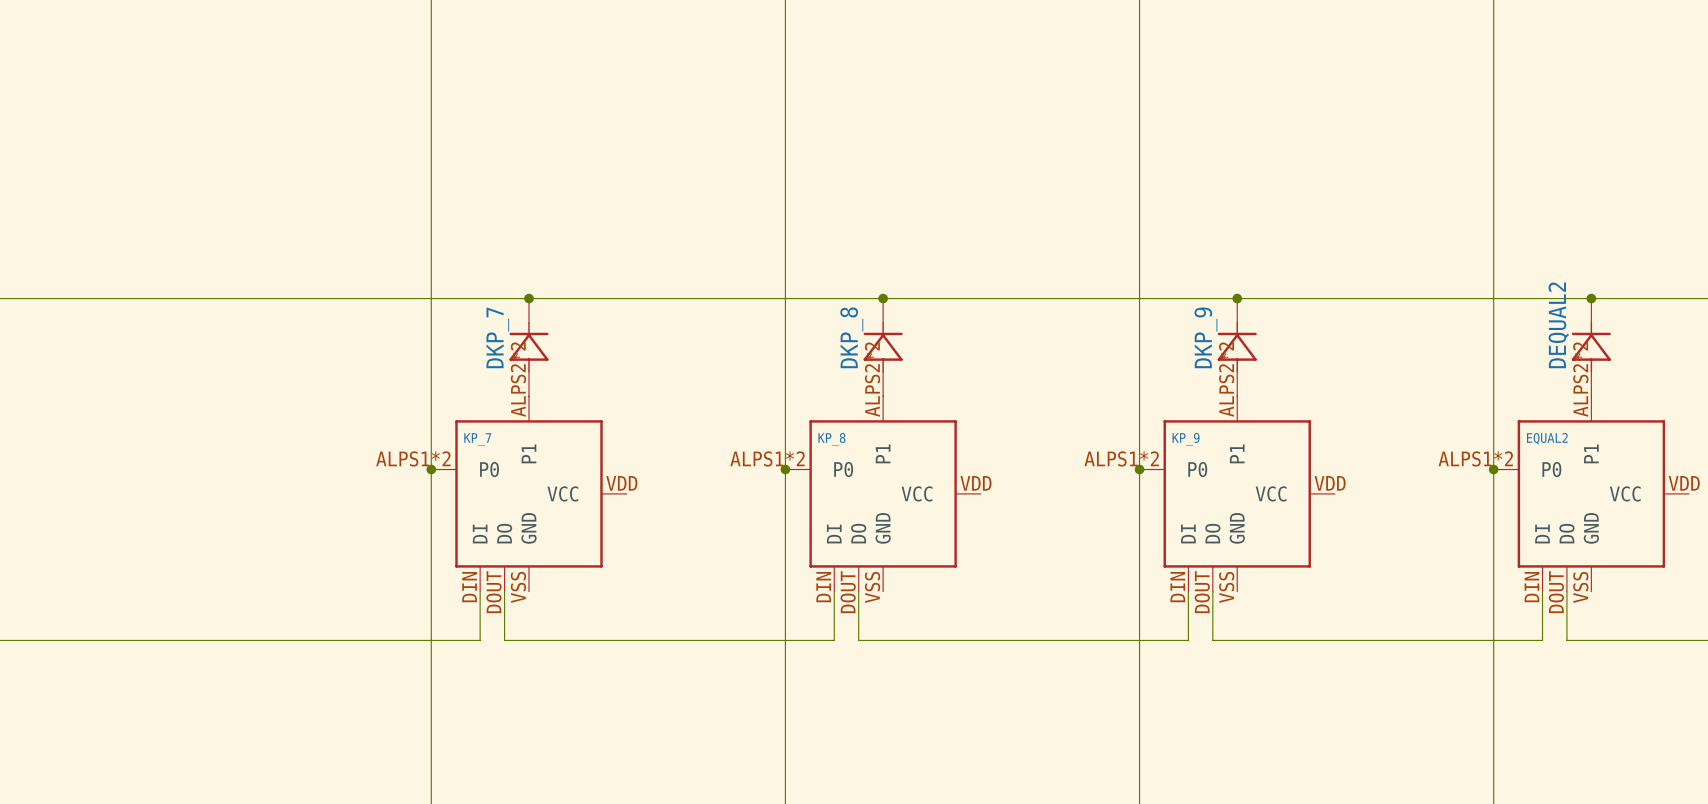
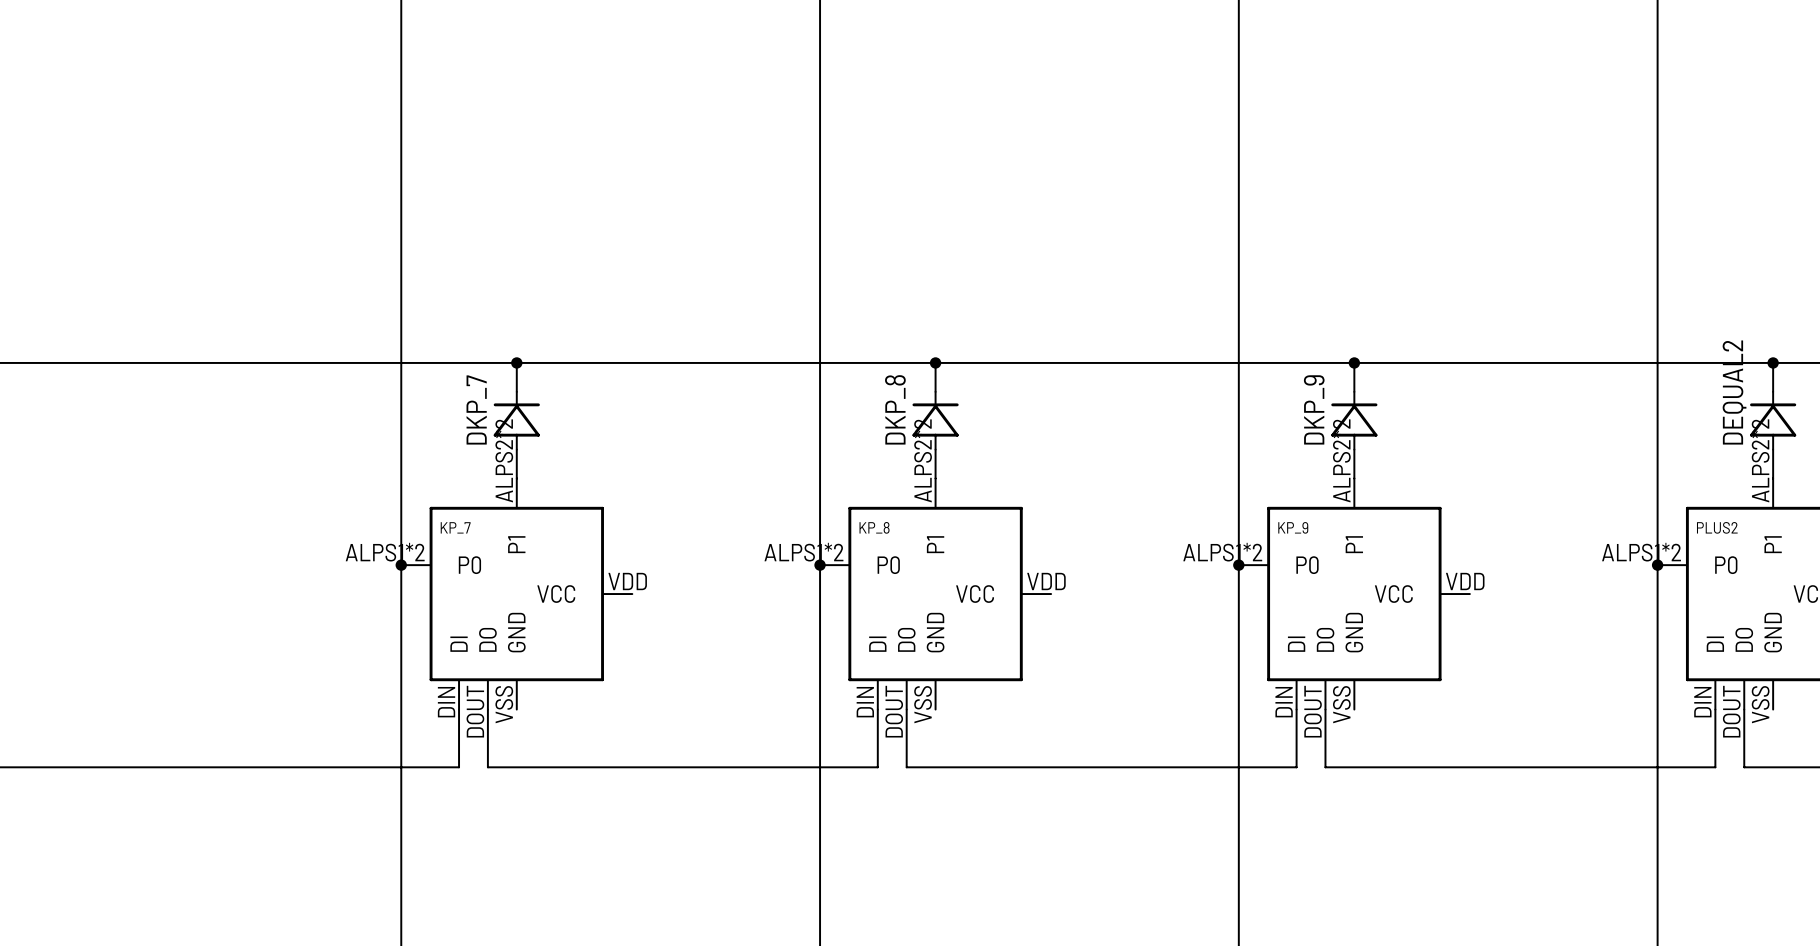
EQUAL2 name: EQUAL2 (1547, 438) -> PLUS2 (1717, 527)

